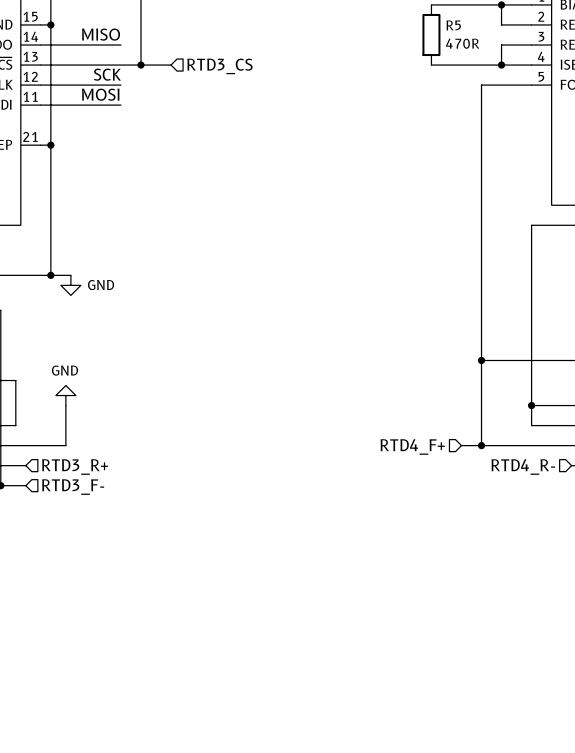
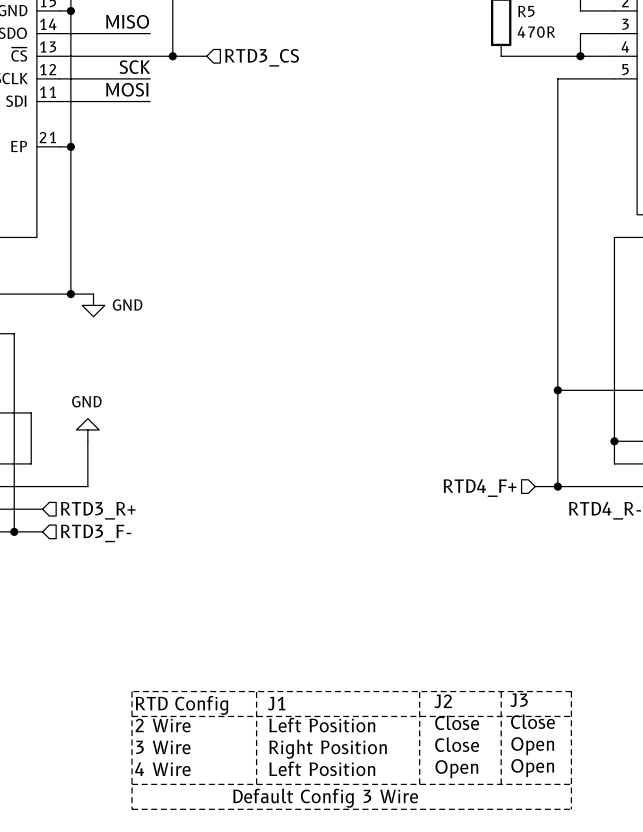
line: none -> (132, 691) (571, 691) (571, 809) (132, 809) (132, 691)
line: none -> (256, 691) (256, 784)
line: none -> (419, 691) (419, 784)
line: none -> (501, 691) (501, 784)
text: none -> J3 (519, 700)
text: none -> J2 (443, 701)
text: none -> J1 (276, 703)
text: none -> RTD Config (181, 705)
line: none -> (132, 716) (571, 716)
text: none -> Close (532, 721)
text: none -> Close (457, 722)
text: none -> 2 Wire (163, 725)
text: none -> Left Position (322, 725)
text: none -> Close (457, 744)
text: none -> Open (532, 746)
text: none -> 3 Wire (163, 747)
text: none -> Right Position (328, 749)
text: none -> Open (532, 768)
text: none -> 4 Wire (162, 769)
text: none -> Left Position (322, 768)
text: none -> Open (456, 769)
line: none -> (132, 784) (571, 784)
text: none -> Default Config 3 Wire (325, 798)

